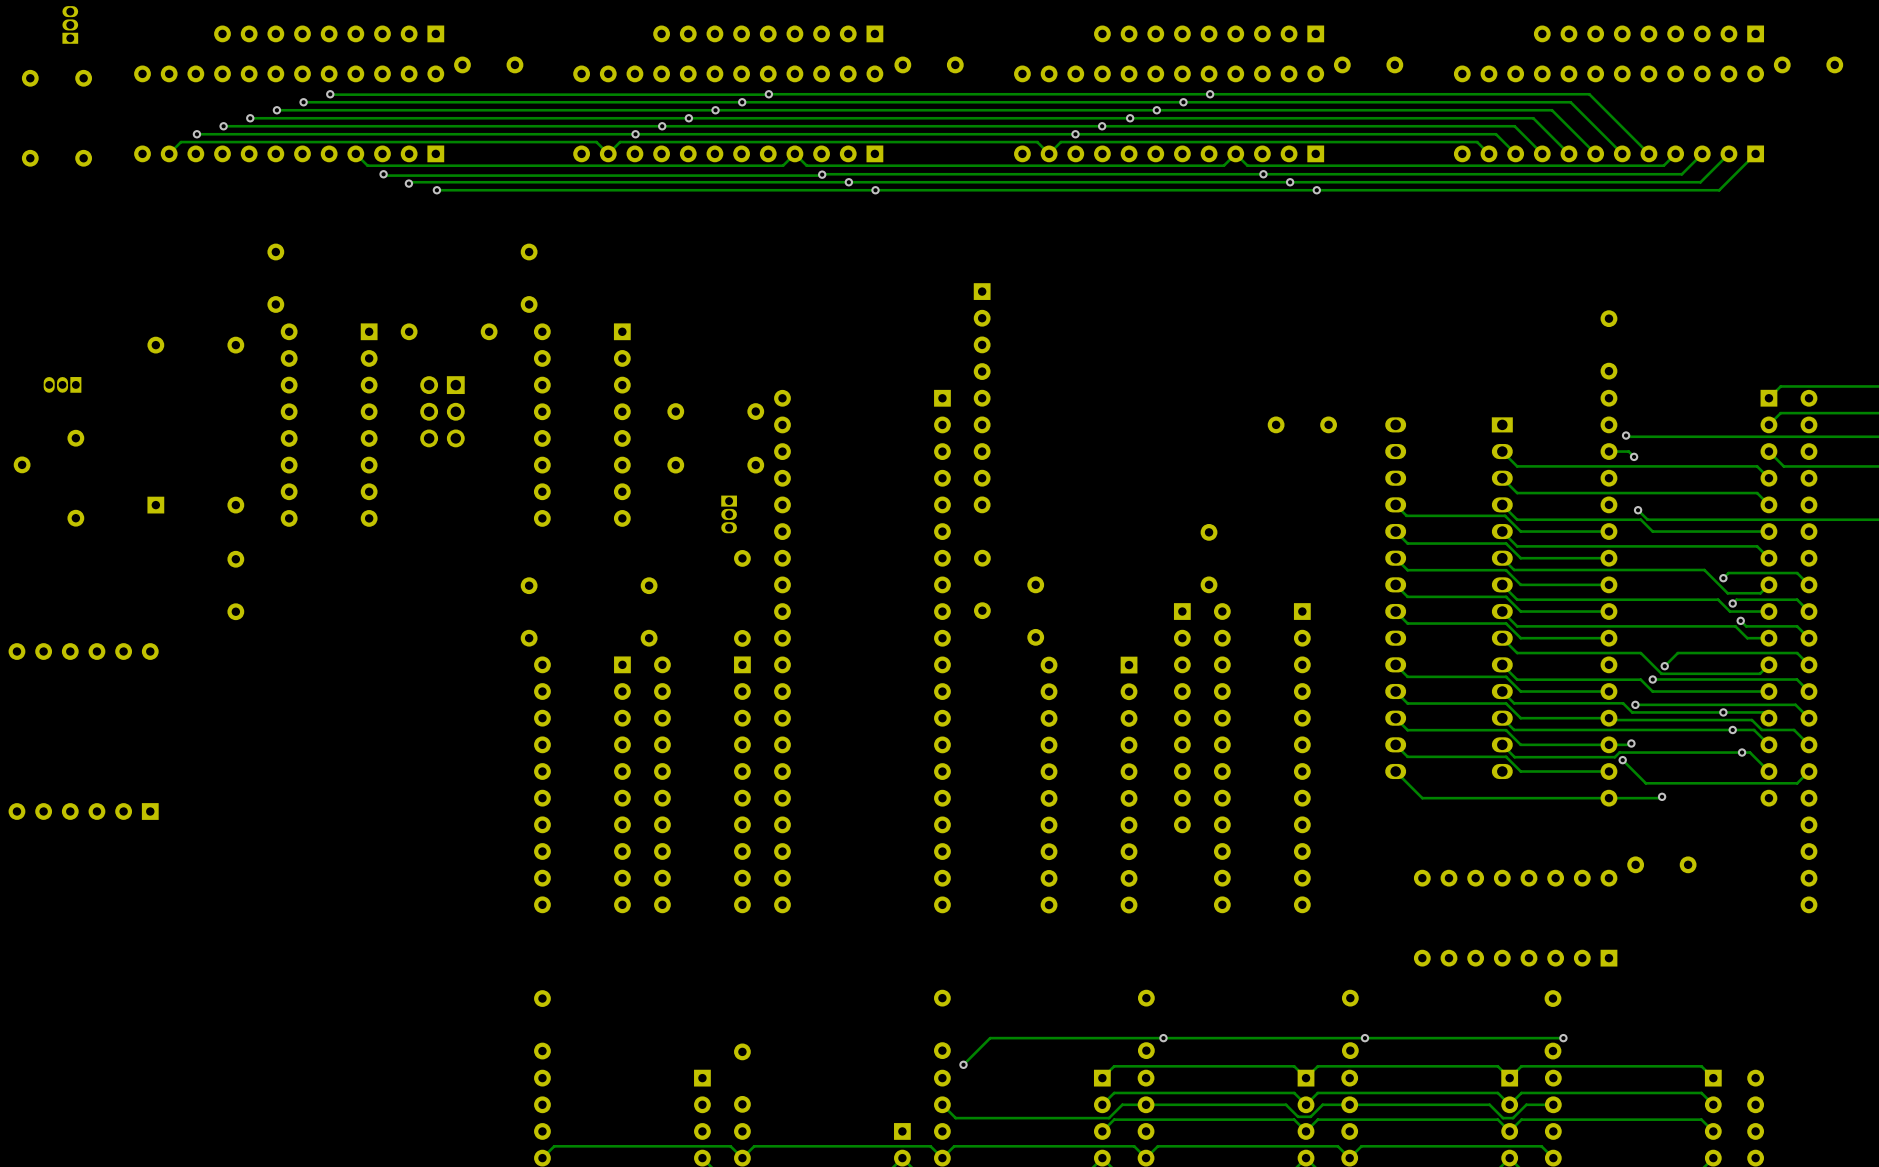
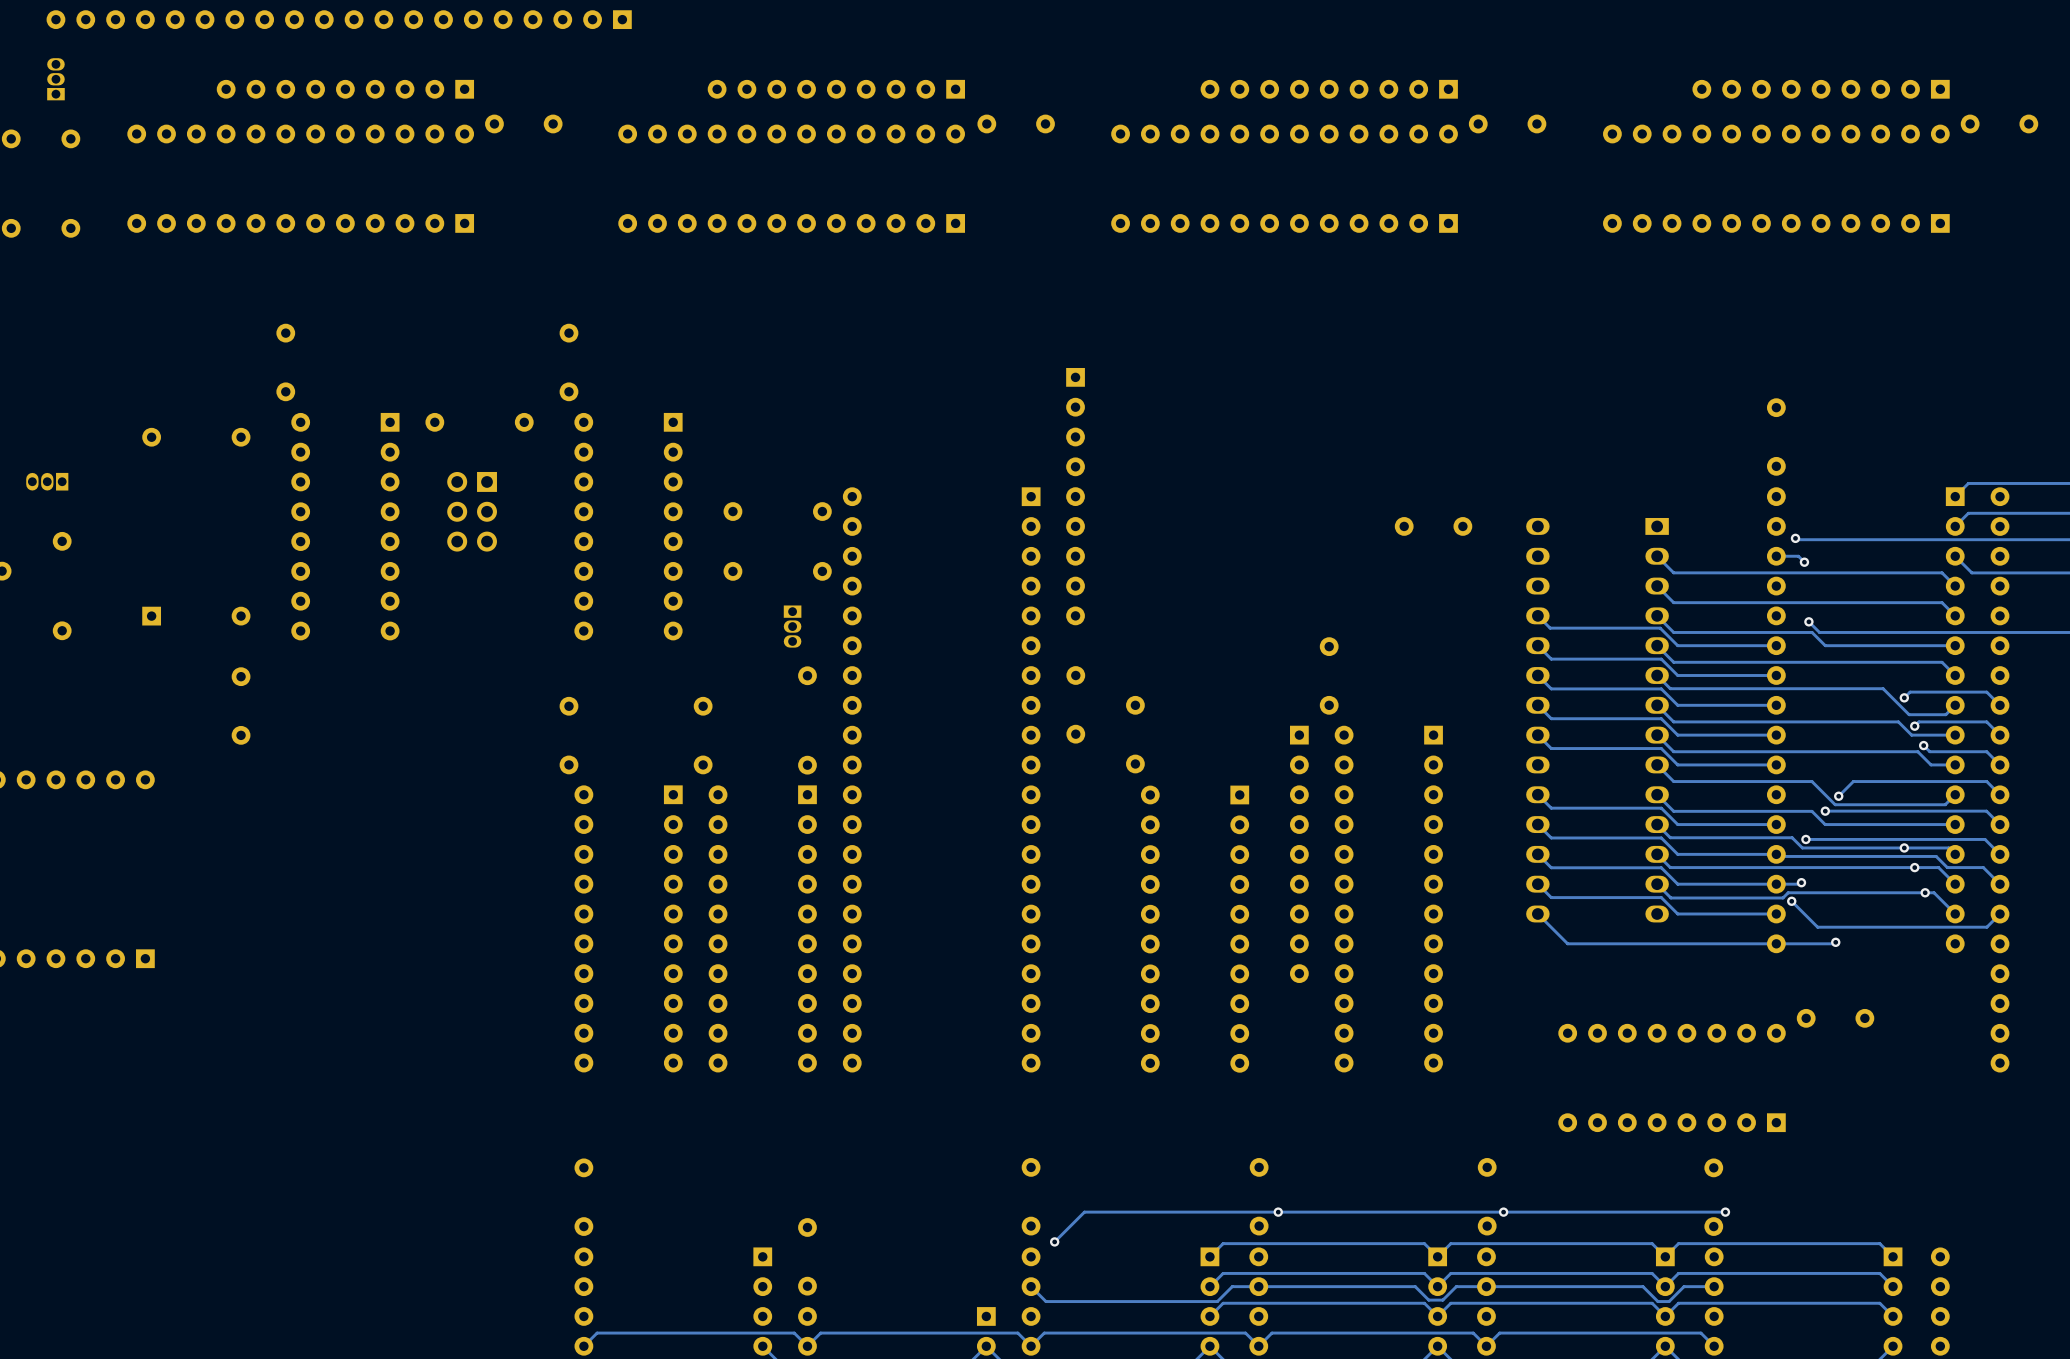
via: (330, 94) -> none
track: (768, 94) (330, 94) -> none
track: (768, 94) (1589, 94) (1648, 153) -> none
via: (768, 94) -> none
via: (1210, 94) -> none
via: (303, 102) -> none
via: (742, 102) -> none
via: (1183, 102) -> none
track: (302, 103) (1570, 102) (1622, 153) -> none
via: (276, 110) -> none
via: (715, 110) -> none
via: (1156, 110) -> none
track: (275, 111) (1552, 110) (1595, 153) -> none
via: (250, 118) -> none
via: (688, 118) -> none
via: (1130, 118) -> none
track: (249, 119) (1533, 118) (1568, 153) -> none
via: (223, 126) -> none
via: (662, 126) -> none
via: (1102, 126) -> none
track: (222, 127) (1514, 126) (1542, 153) -> none
track: (196, 134) (1496, 134) (1515, 153) -> none
via: (196, 134) -> none
via: (635, 134) -> none
via: (1075, 134) -> none
track: (1488, 153) (1477, 142) (1060, 142) (1049, 153) (1037, 142) (620, 142) (608, 153) (596, 142) (180, 142) (169, 153) -> none
track: (1675, 153) (1663, 165) (1247, 165) (1235, 153) (1223, 165) (806, 165) (794, 153) (783, 165) (367, 165) (355, 153) -> none
track: (1702, 153) (1681, 174) (822, 174) -> none
track: (1728, 153) (1700, 182) (410, 182) -> none
track: (1755, 153) (1719, 190) (435, 189) -> none
via: (383, 174) -> none
via: (822, 174) -> none
via: (1263, 174) -> none
track: (821, 175) (384, 175) -> none
via: (848, 182) -> none
via: (1290, 182) -> none
via: (408, 183) -> none
via: (436, 190) -> none
via: (875, 190) -> none
via: (1316, 190) -> none

